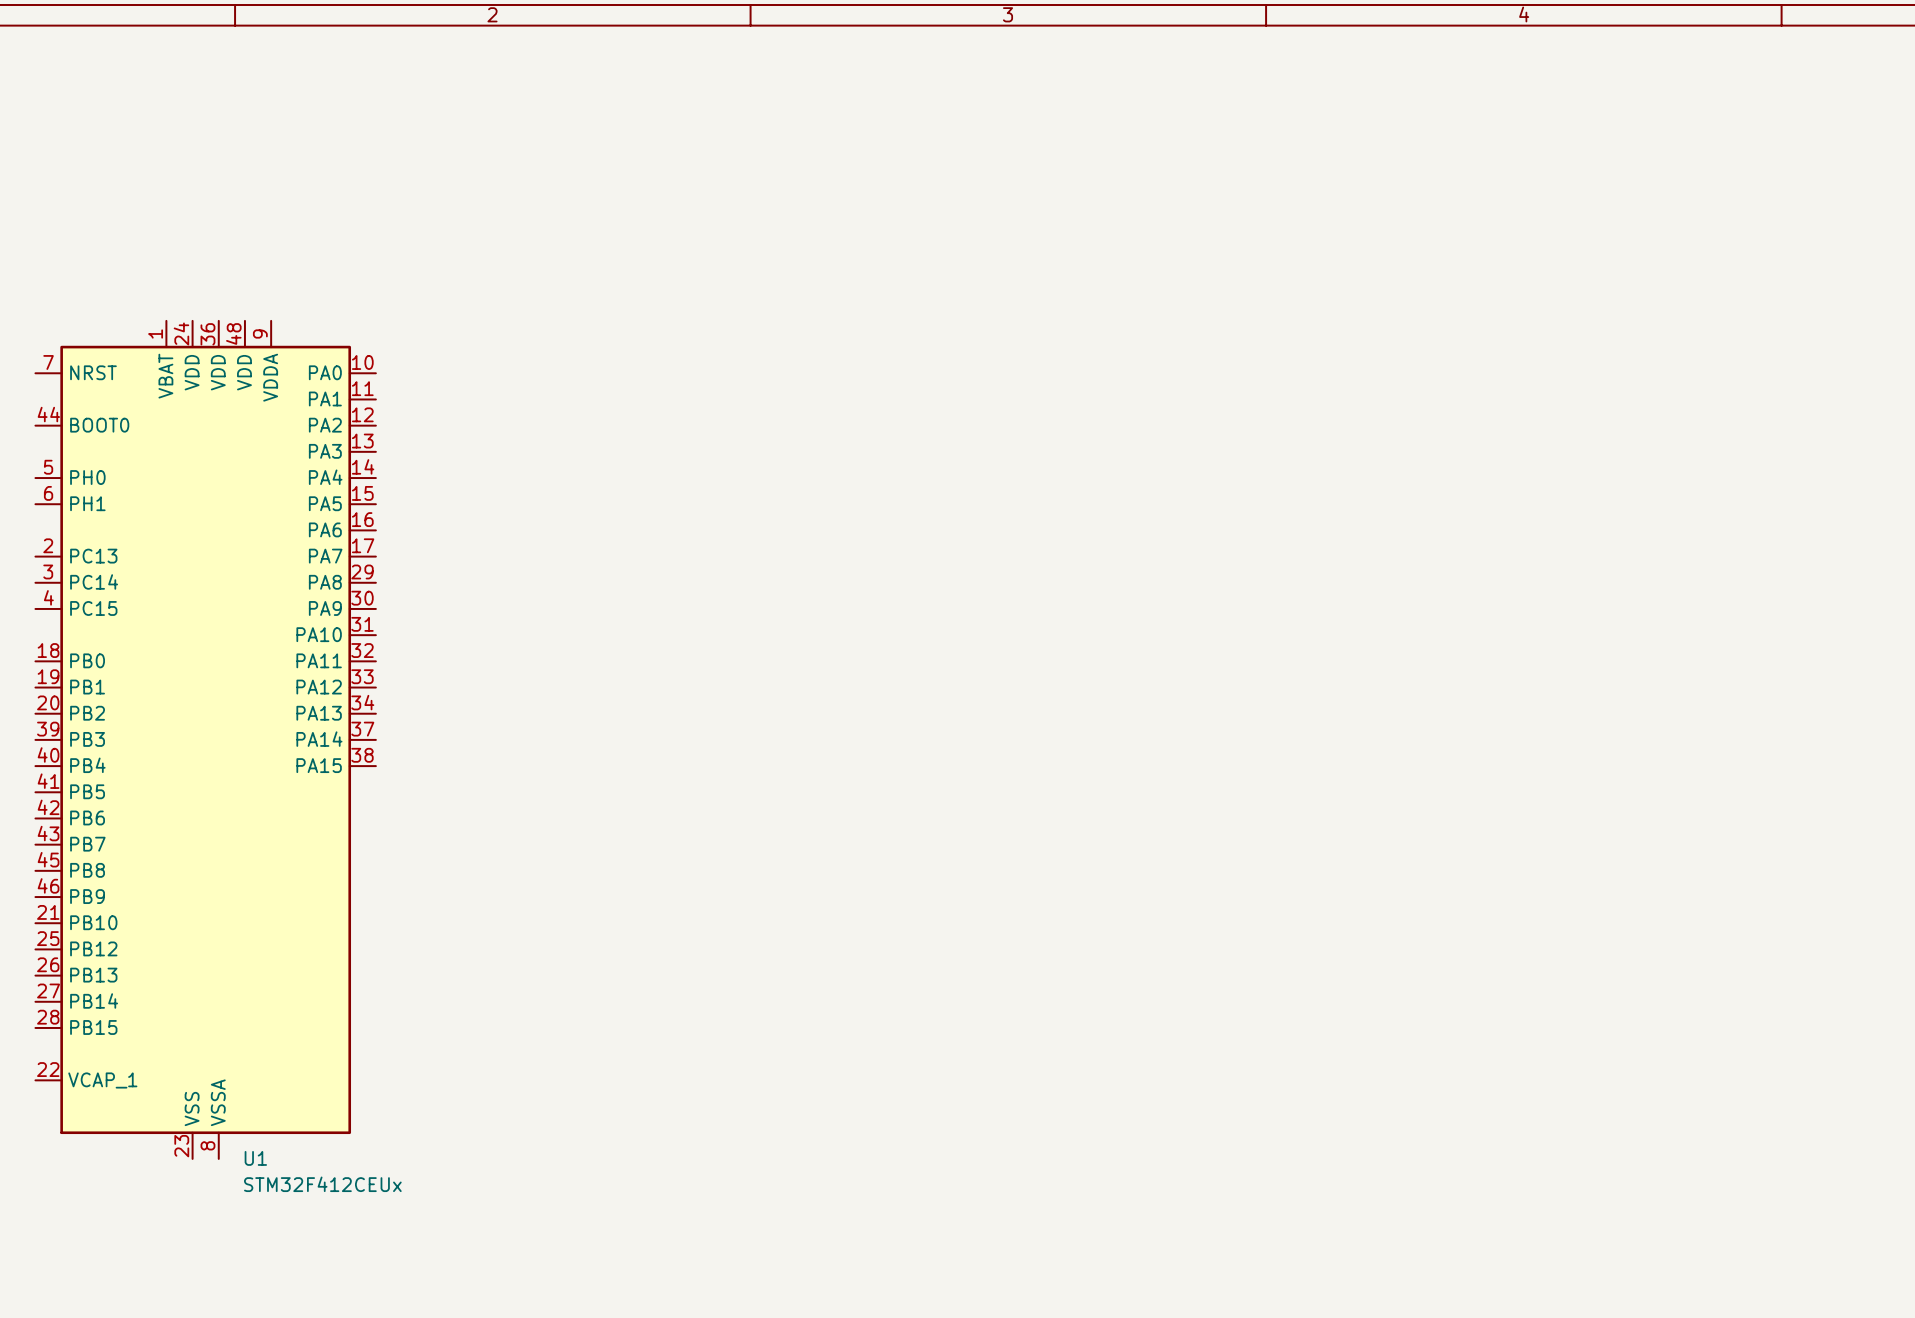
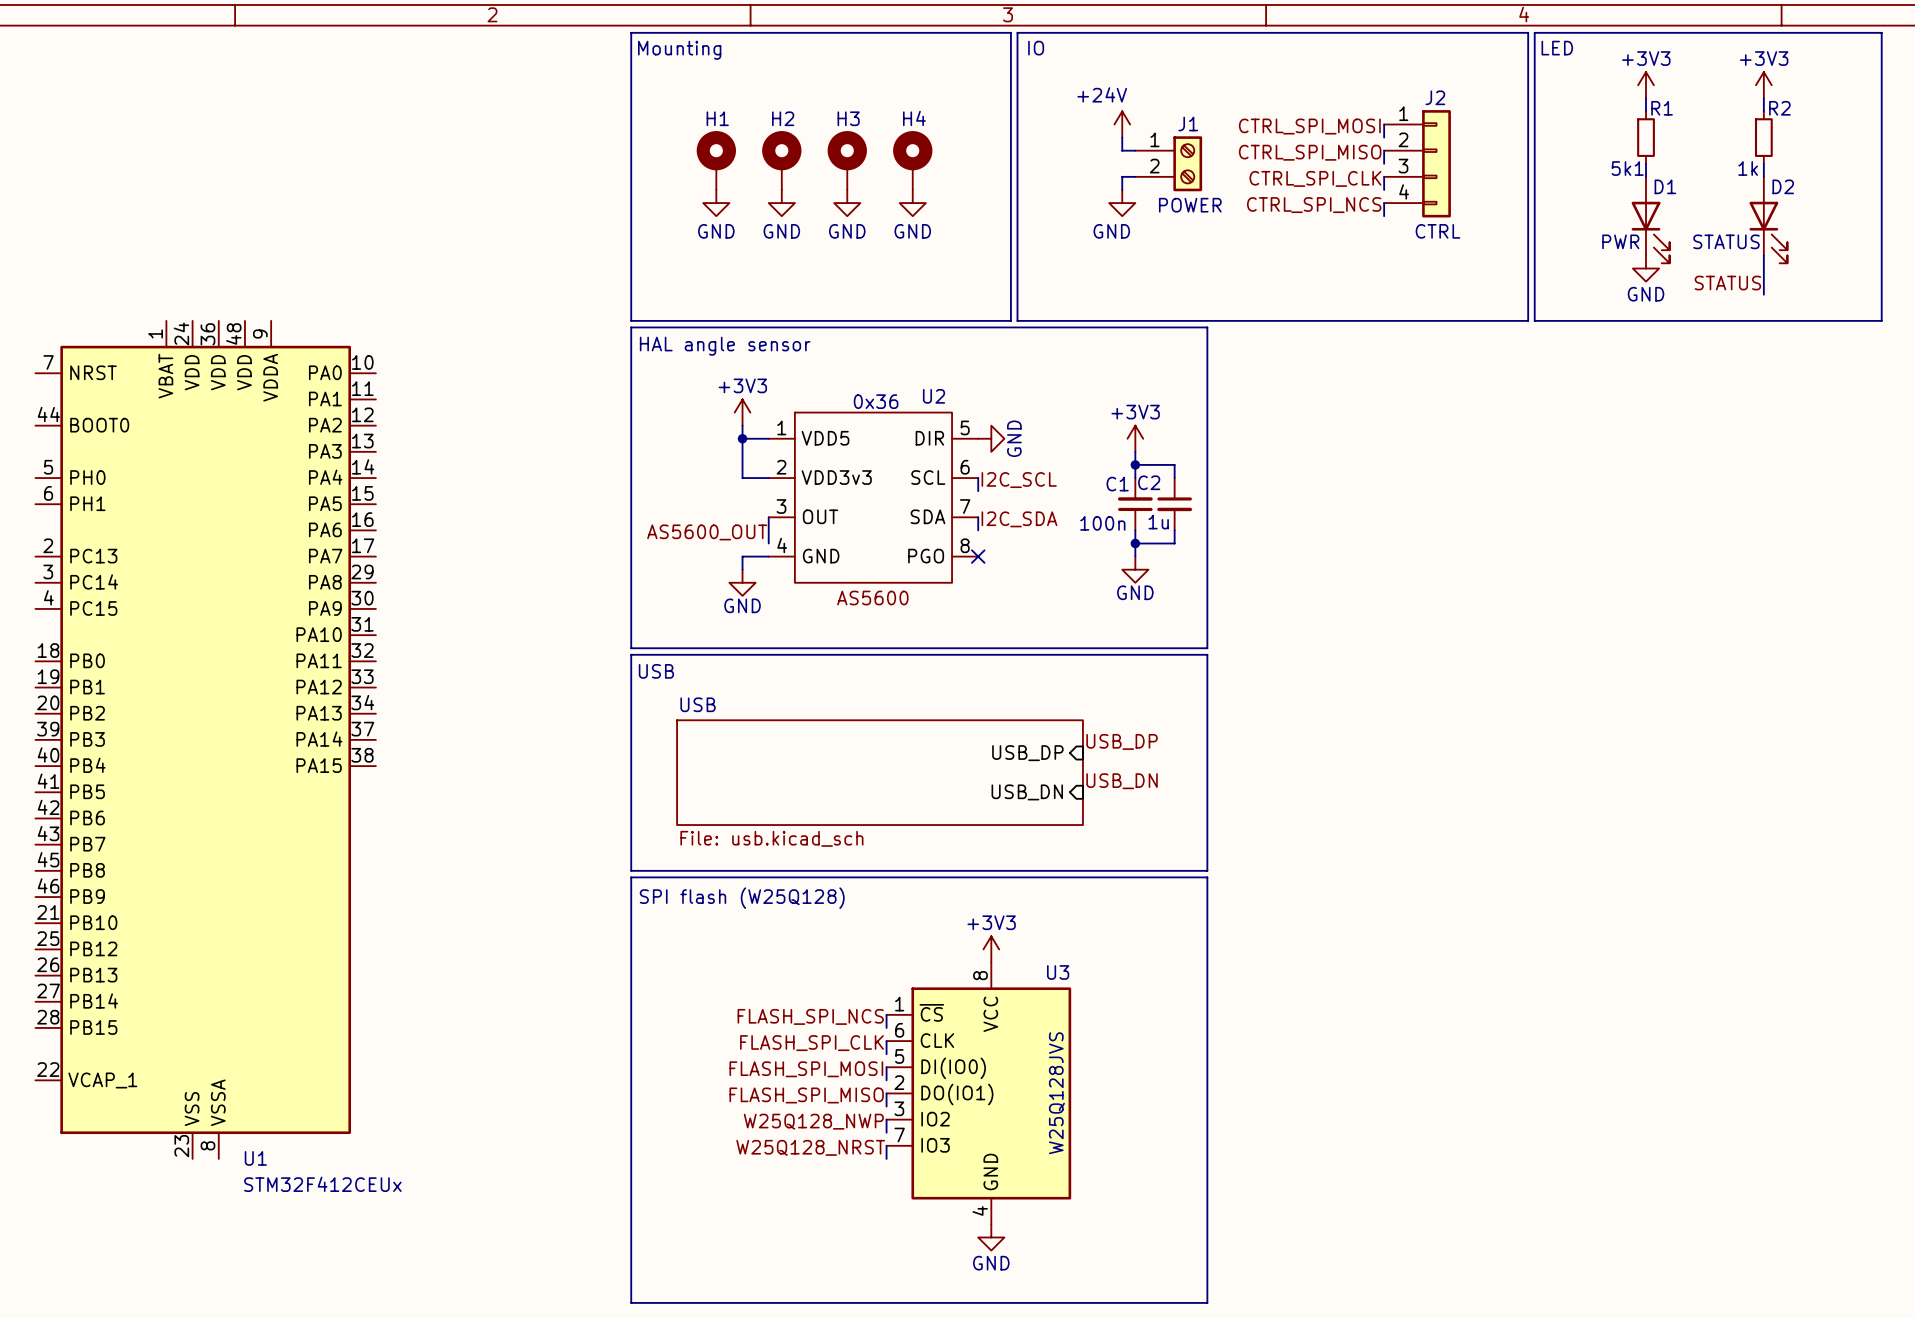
line: none -> (631, 32) (631, 320) (1010, 320) (1010, 32) (631, 32)
line: none -> (1017, 32) (1528, 32) (1528, 320) (1017, 320) (1017, 32)
line: none -> (1534, 32) (1881, 32) (1881, 320) (1534, 320) (1534, 32)
text: none -> IO (1036, 48)
text: none -> LED (1557, 48)
text: none -> Mounting (679, 50)
power symbol: none -> +3V3 (1646, 85)
power symbol: none -> +3V3 (1763, 85)
wire: none -> (1646, 98) (1646, 111)
wire: none -> (1763, 98) (1763, 111)
power symbol: none -> +24V (1122, 124)
wire: none -> (1384, 124) (1384, 137)
label: none -> CTRL_SPI_MOSI (1309, 126)
wire: none -> (1122, 137) (1122, 150) (1135, 150)
R1: none -> 5k1 (1646, 137)
R2: none -> 1k (1763, 137)
wire: none -> (1384, 150) (1384, 163)
label: none -> CTRL_SPI_MISO (1310, 152)
H1: none -> (716, 160)
H2: none -> (781, 160)
H3: none -> (847, 160)
H4: none -> (912, 160)
J1: none -> POWER (1168, 163)
J2: none -> CTRL (1417, 163)
wire: none -> (1646, 163) (1646, 176)
wire: none -> (1763, 163) (1763, 176)
wire: none -> (1135, 176) (1122, 176) (1122, 189)
wire: none -> (1384, 176) (1384, 189)
label: none -> CTRL_SPI_CLK (1315, 178)
power symbol: none -> GND (716, 203)
power symbol: none -> GND (781, 203)
power symbol: none -> GND (847, 203)
power symbol: none -> GND (912, 203)
power symbol: none -> GND (1122, 203)
wire: none -> (1384, 203) (1384, 216)
label: none -> CTRL_SPI_NCS (1314, 205)
D1: none -> PWR (1650, 220)
D2: none -> STATUS (1768, 220)
wire: none -> (1763, 255) (1763, 294)
power symbol: none -> GND (1646, 268)
label: none -> STATUS (1727, 283)
line: none -> (631, 327) (631, 648) (1207, 648) (1207, 327) (631, 327)
text: none -> HAL angle sensor (725, 346)
text: none -> 0x36 (876, 401)
power symbol: none -> +3V3 (742, 412)
wire: none -> (742, 425) (742, 478) (768, 478)
wire: none -> (742, 438) (768, 438)
junction: none -> (742, 438)
power symbol: none -> GND (991, 438)
power symbol: none -> +3V3 (1135, 438)
wire: none -> (1135, 451) (1135, 478)
wire: none -> (1135, 464) (1174, 464) (1174, 478)
junction: none -> (1135, 464)
wire: none -> (978, 478) (978, 491)
label: none -> I2C_SCL (1019, 480)
U2: none -> (873, 497)
C1: none -> 100n (1135, 504)
C2: none -> 1u (1174, 504)
wire: none -> (768, 517) (768, 543)
wire: none -> (978, 517) (978, 530)
label: none -> I2C_SDA (1019, 519)
wire: none -> (1135, 530) (1135, 556)
wire: none -> (1174, 530) (1174, 543) (1135, 543)
label: none -> AS5600_OUT (707, 532)
junction: none -> (1135, 543)
wire: none -> (768, 556) (742, 556) (742, 569)
no-connect mark: none -> (978, 556)
power symbol: none -> GND (1135, 569)
power symbol: none -> GND (742, 582)
line: none -> (631, 654) (631, 870) (1207, 870) (1207, 654) (631, 654)
text: none -> USB (656, 671)
label: none -> USB_DP (1122, 741)
sheet pin: none -> USB_DP (1027, 753)
sheet USB: none -> File: usb.kicad_sch (880, 772)
label: none -> USB_DN (1122, 781)
sheet pin: none -> USB_DN (1027, 792)
line: none -> (631, 877) (1207, 877) (1207, 1302) (631, 1302) (631, 877)
text: none -> SPI flash (W25Q128) (742, 898)
power symbol: none -> +3V3 (991, 949)
wire: none -> (886, 1014) (886, 1027)
label: none -> FLASH_SPI_NCS (810, 1016)
wire: none -> (886, 1041) (886, 1054)
label: none -> FLASH_SPI_CLK (811, 1043)
wire: none -> (886, 1067) (886, 1080)
label: none -> FLASH_SPI_MOSI (806, 1069)
wire: none -> (886, 1093) (886, 1106)
U3: none -> W25Q128JVS (978, 1093)
label: none -> FLASH_SPI_MISO (806, 1095)
wire: none -> (886, 1119) (886, 1132)
label: none -> W25Q128_NWP (813, 1121)
wire: none -> (886, 1145) (886, 1158)
label: none -> W25Q128_NRST (810, 1147)
power symbol: none -> GND (991, 1237)

